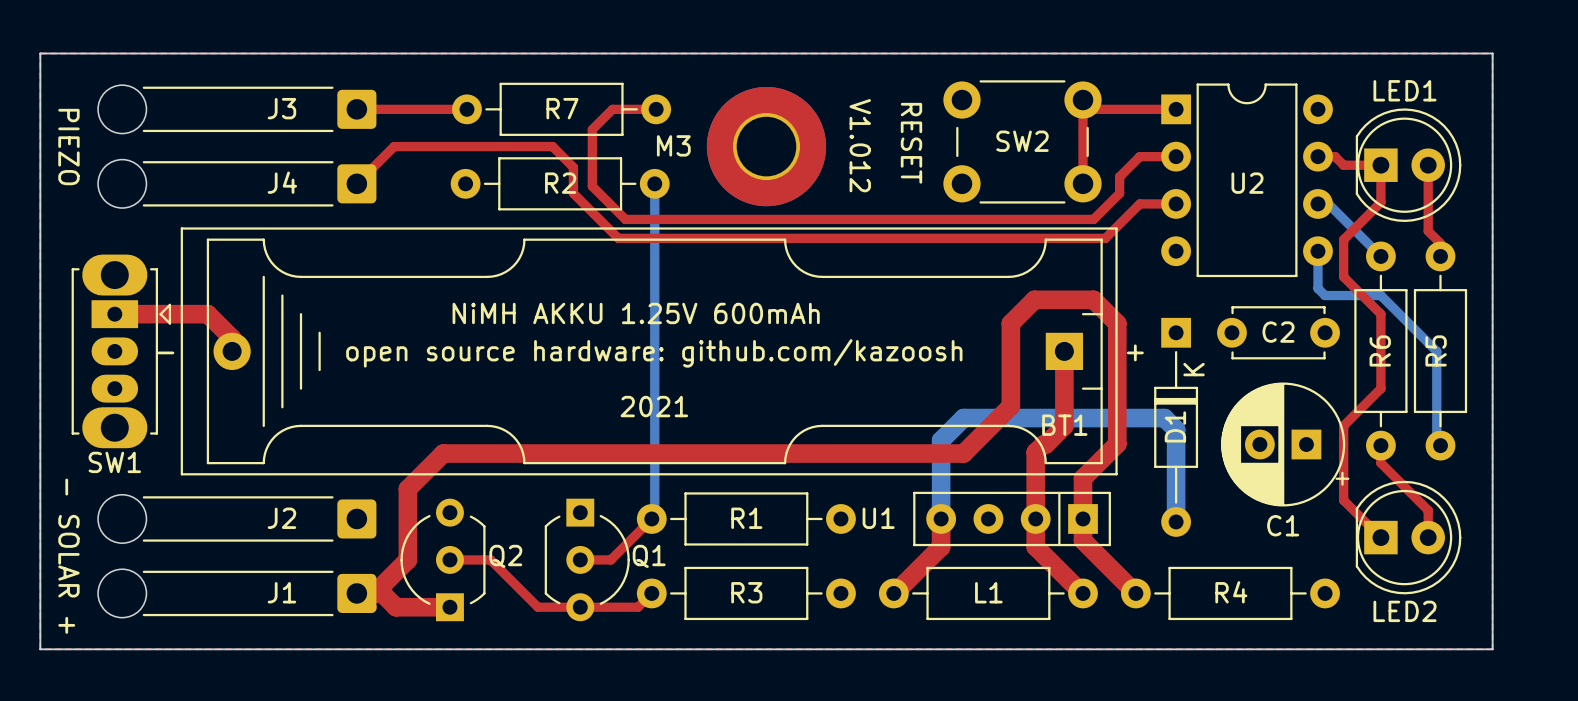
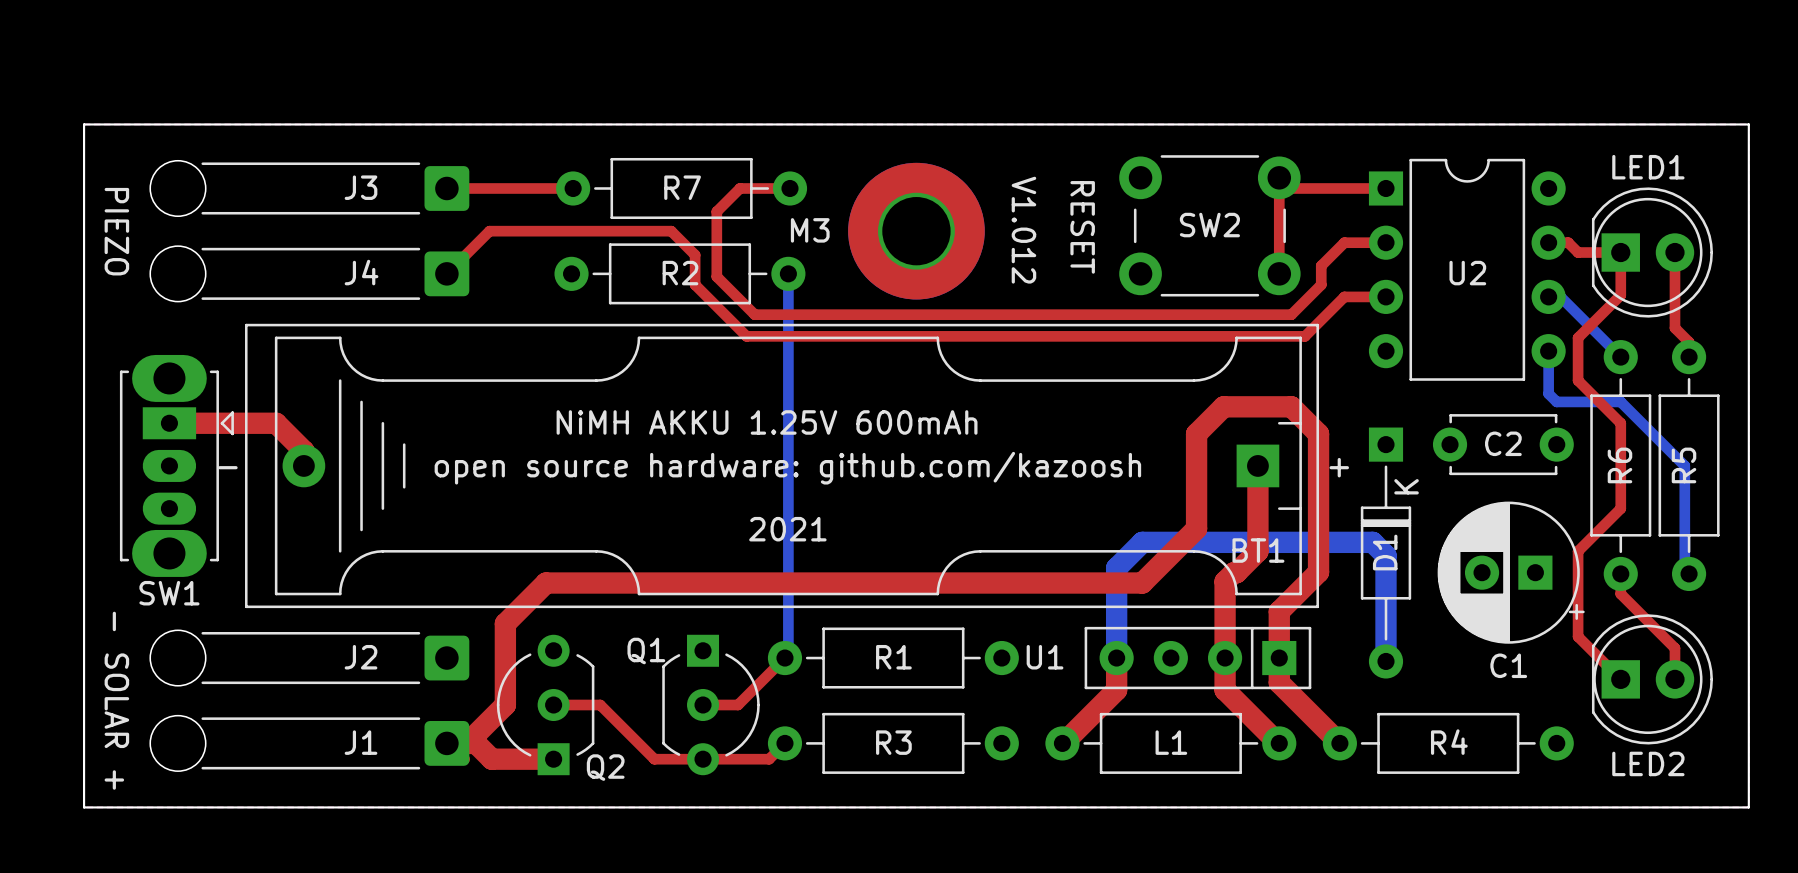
Q2 name position: Q2 (505, 556) -> Q2 (605, 767)
Q1 name position: Q1 (649, 556) -> Q1 (646, 651)

